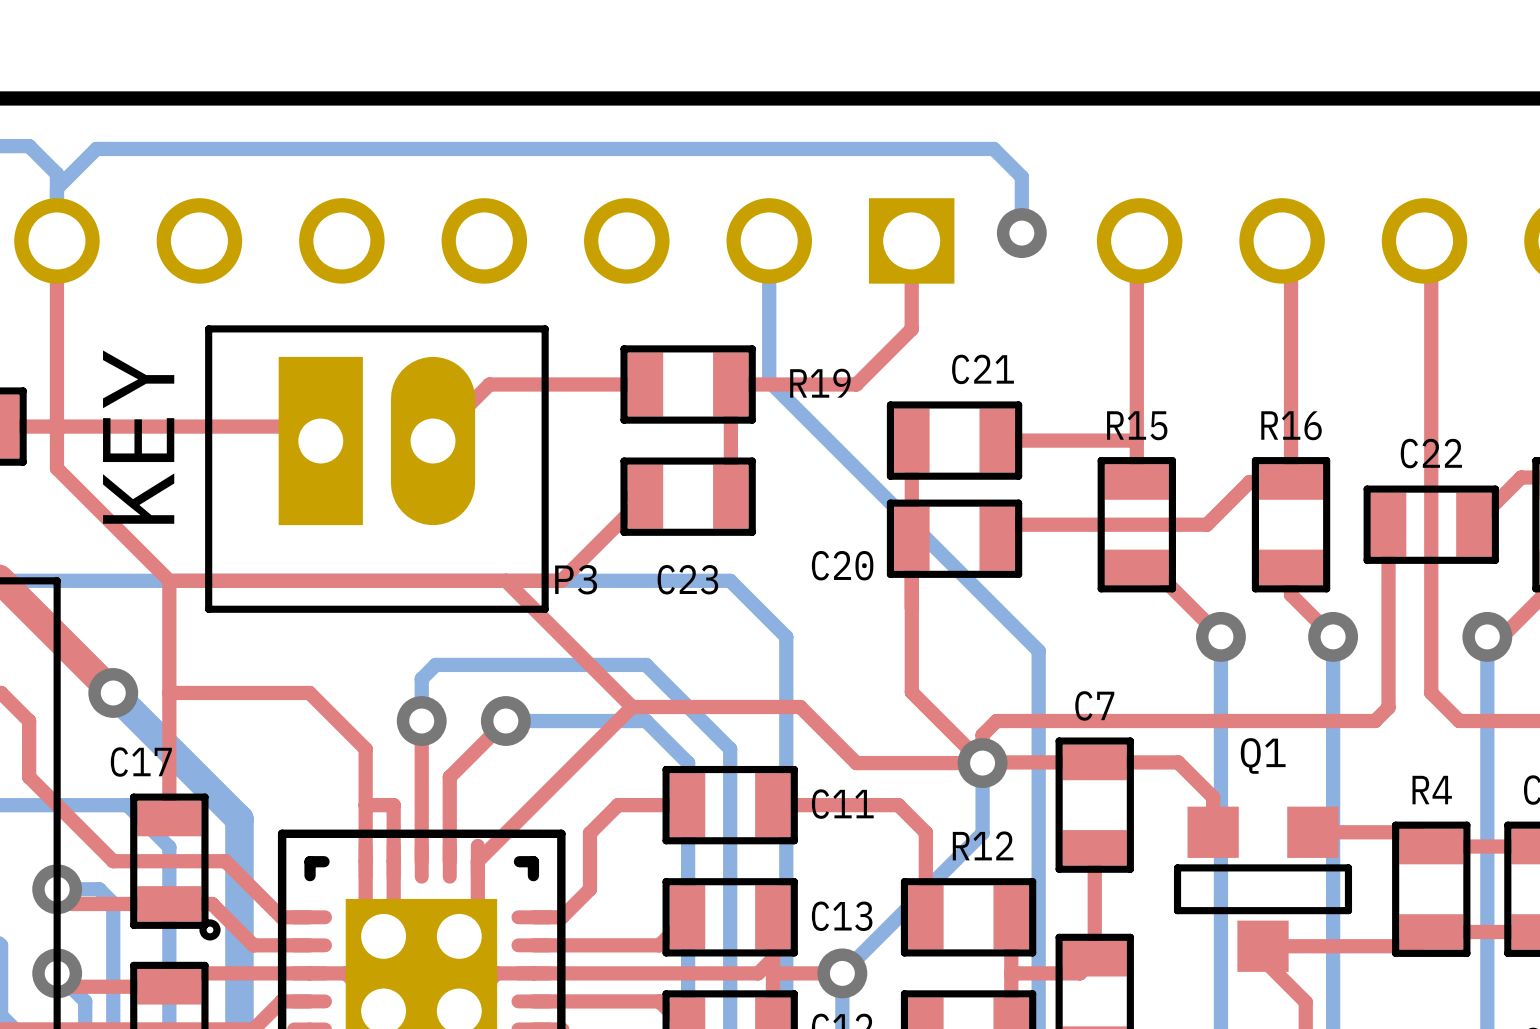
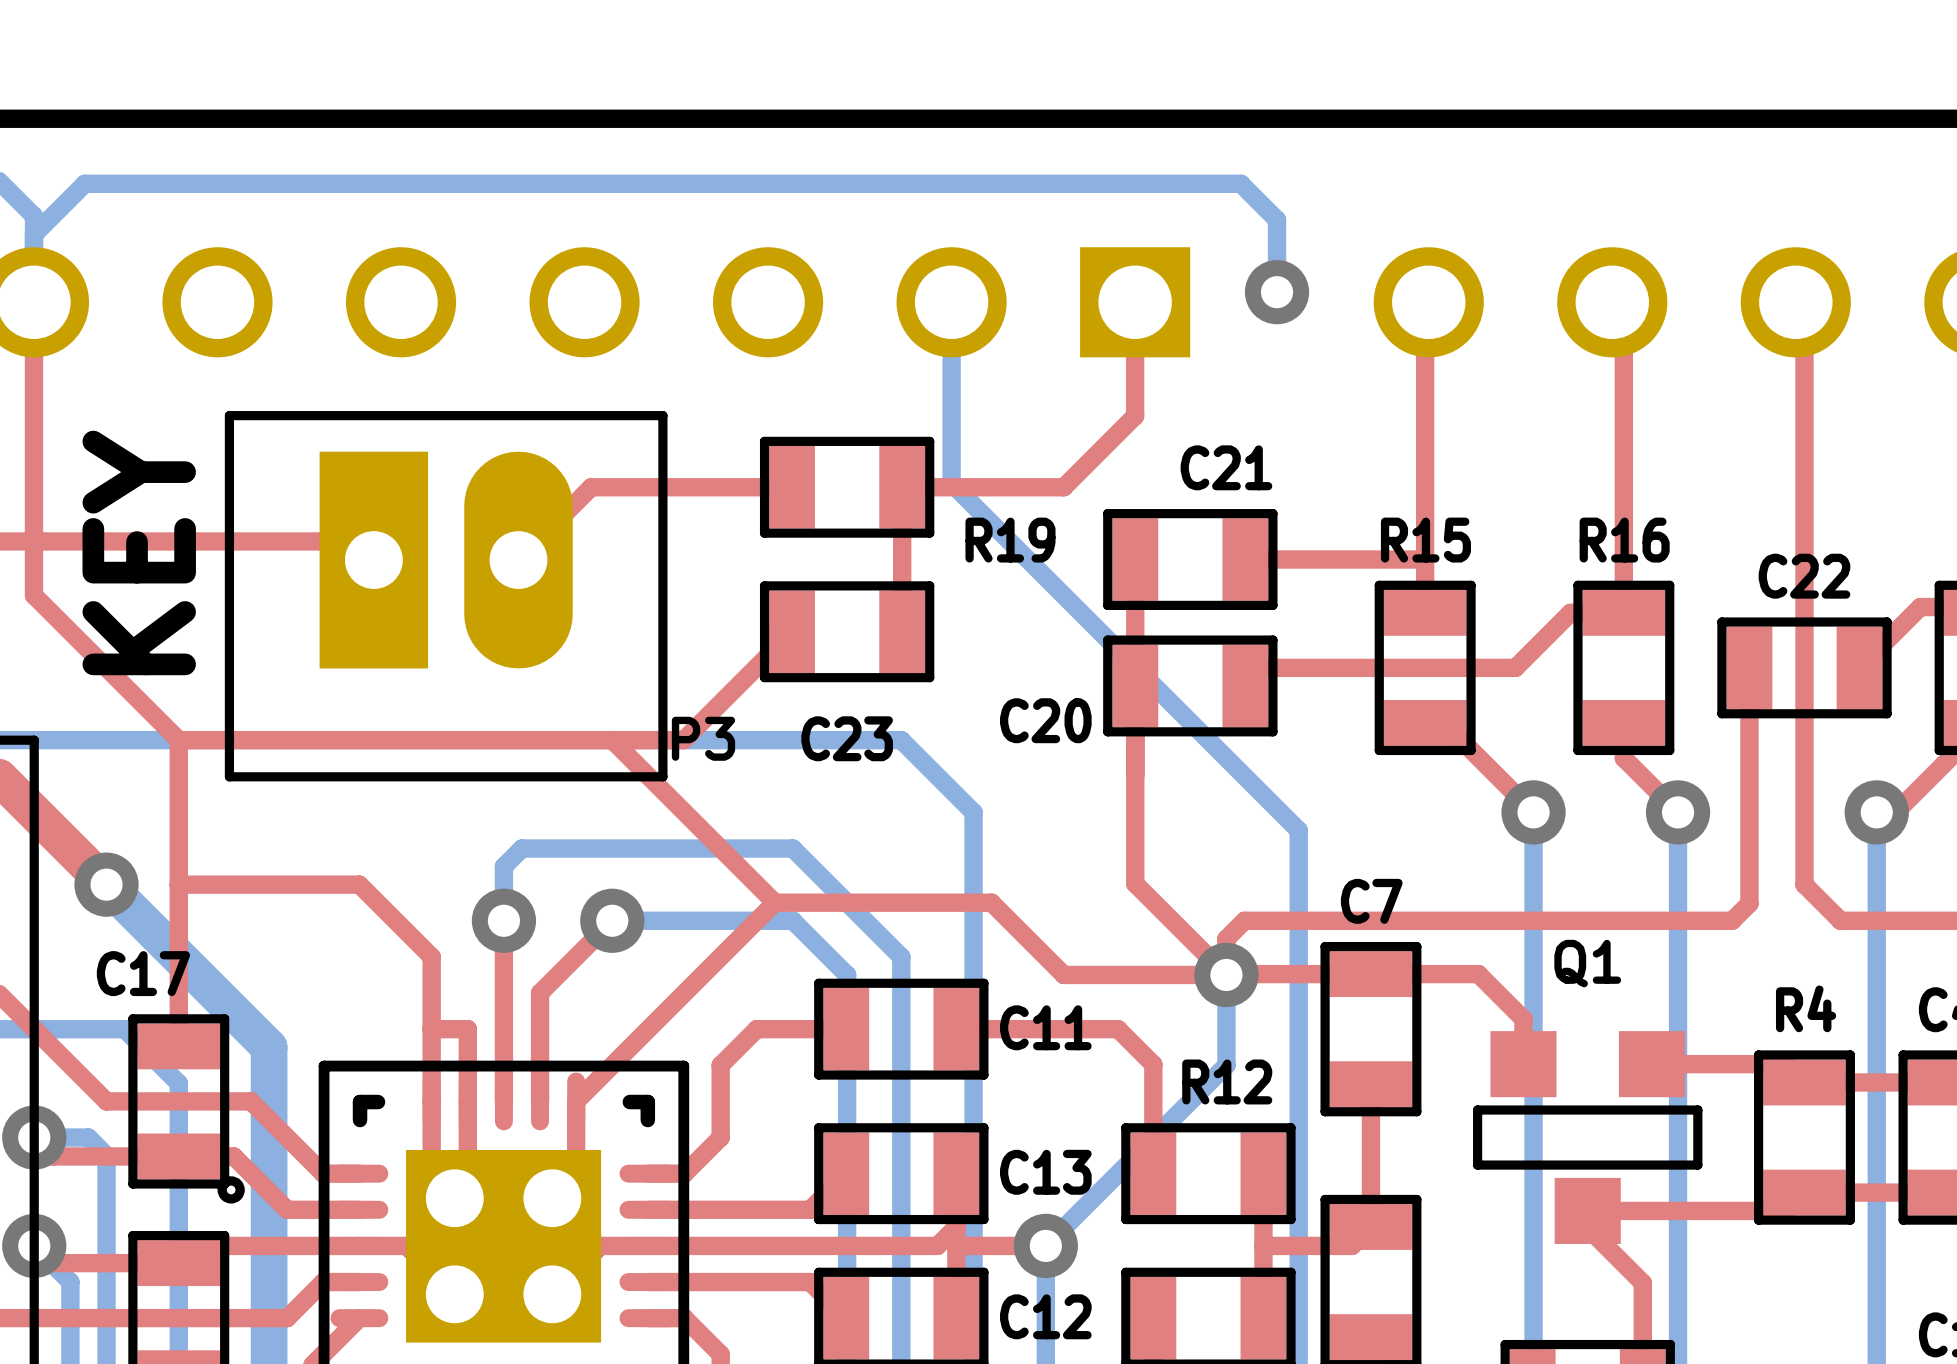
R19 name position: R19 (820, 383) -> R19 (1010, 540)

